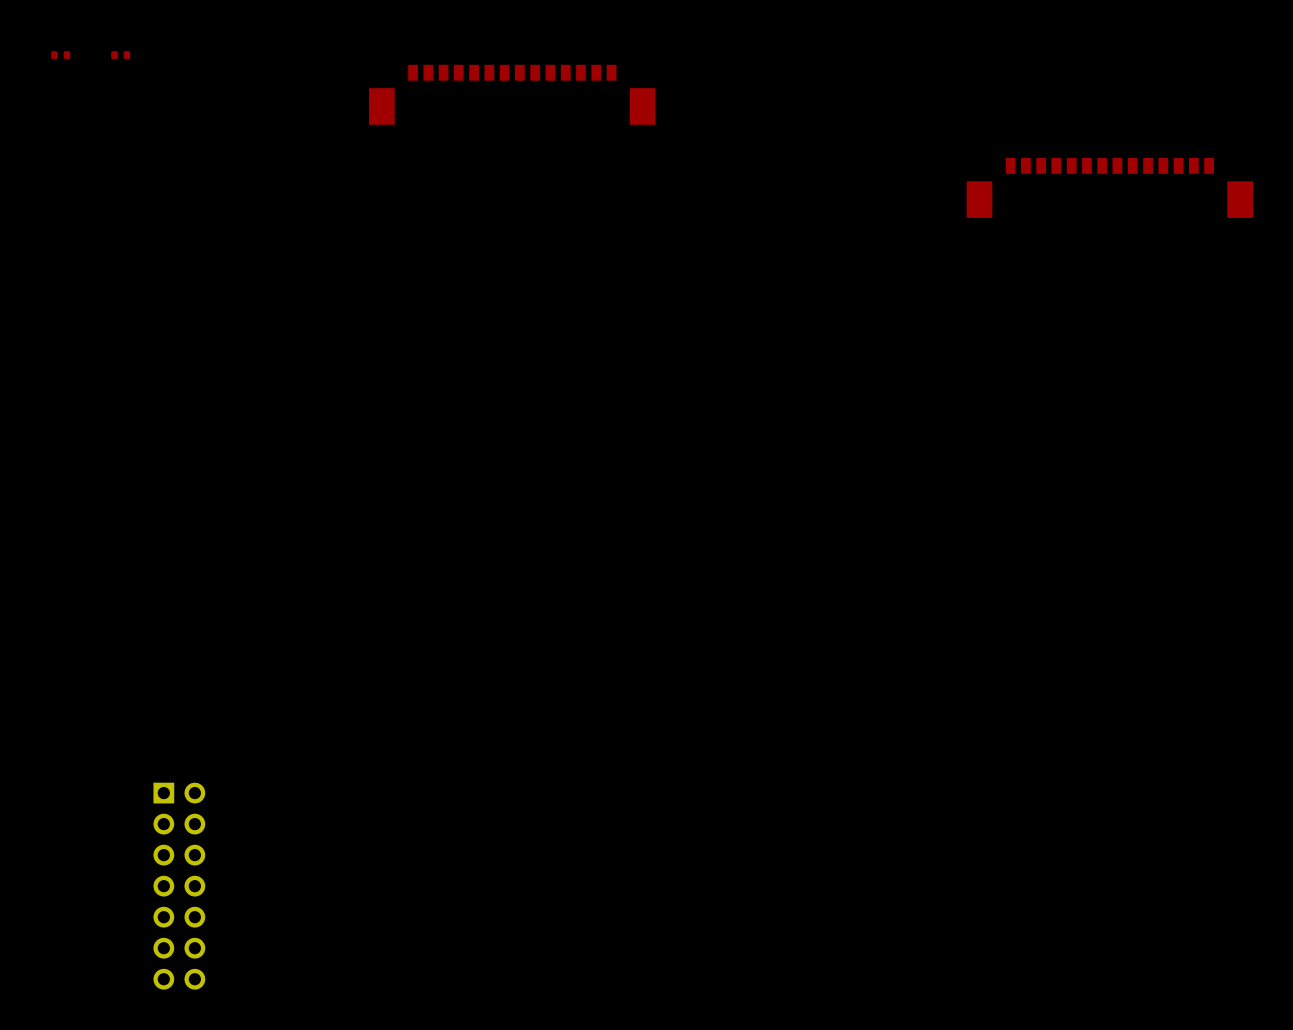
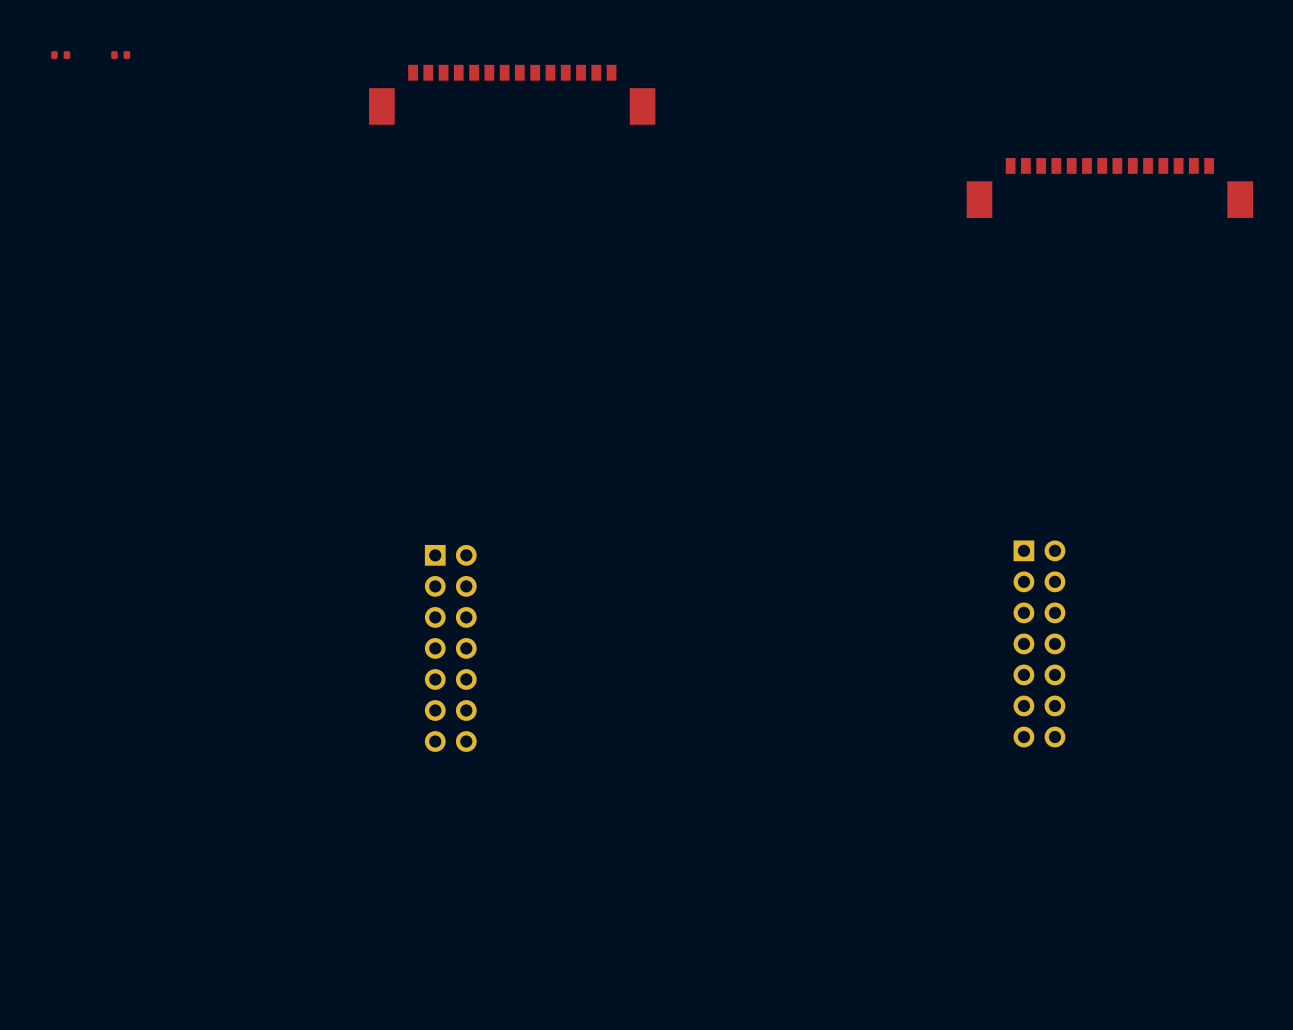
part: none -> (1039, 643)
part: none -> (450, 648)
part: (179, 886) -> none

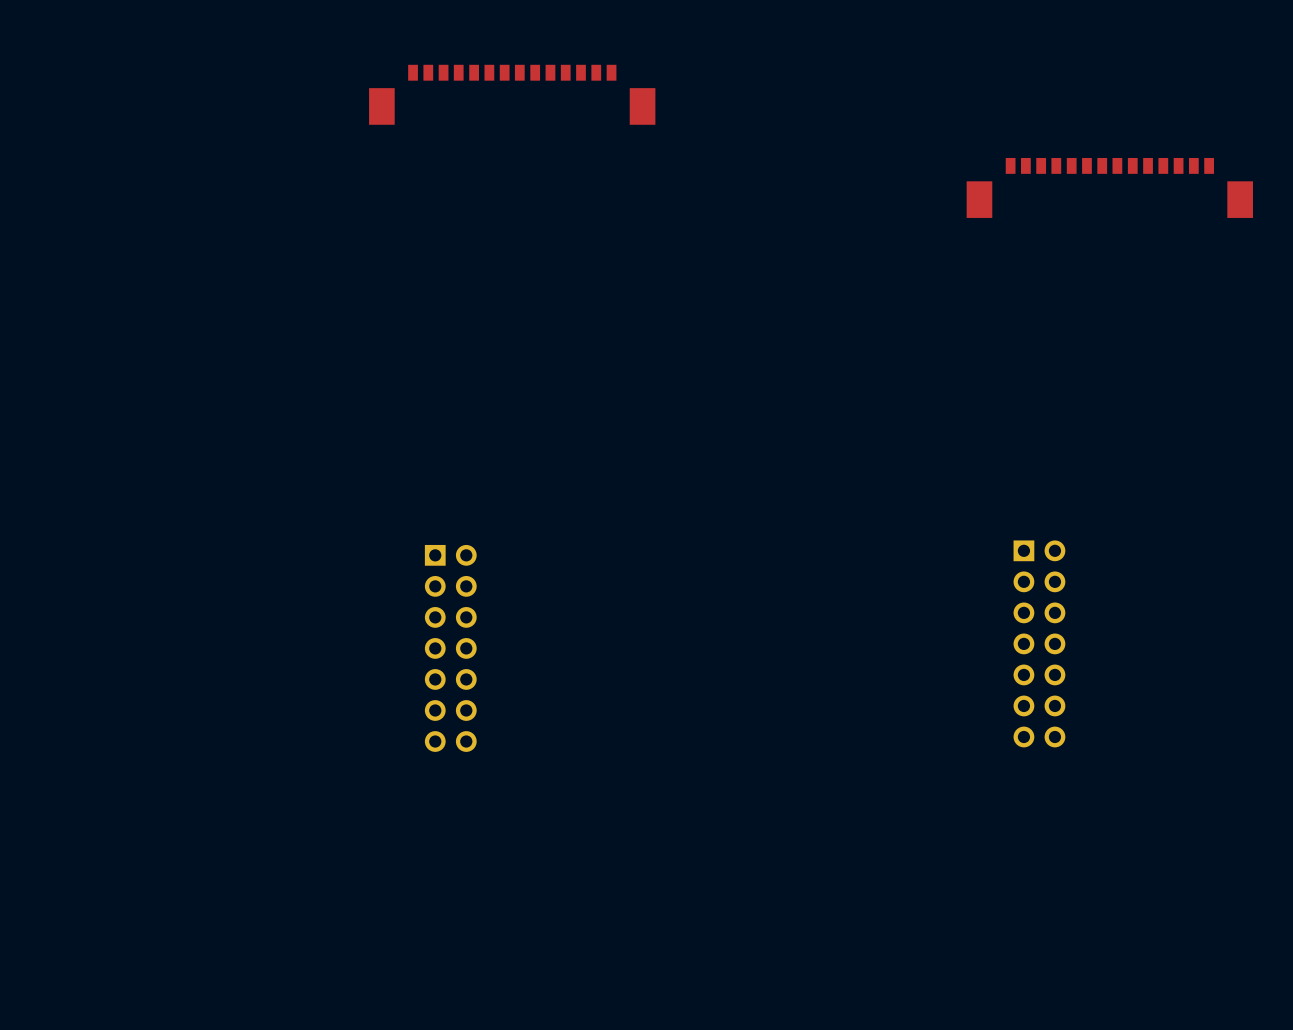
part: (60, 55) -> none
part: (120, 55) -> none

